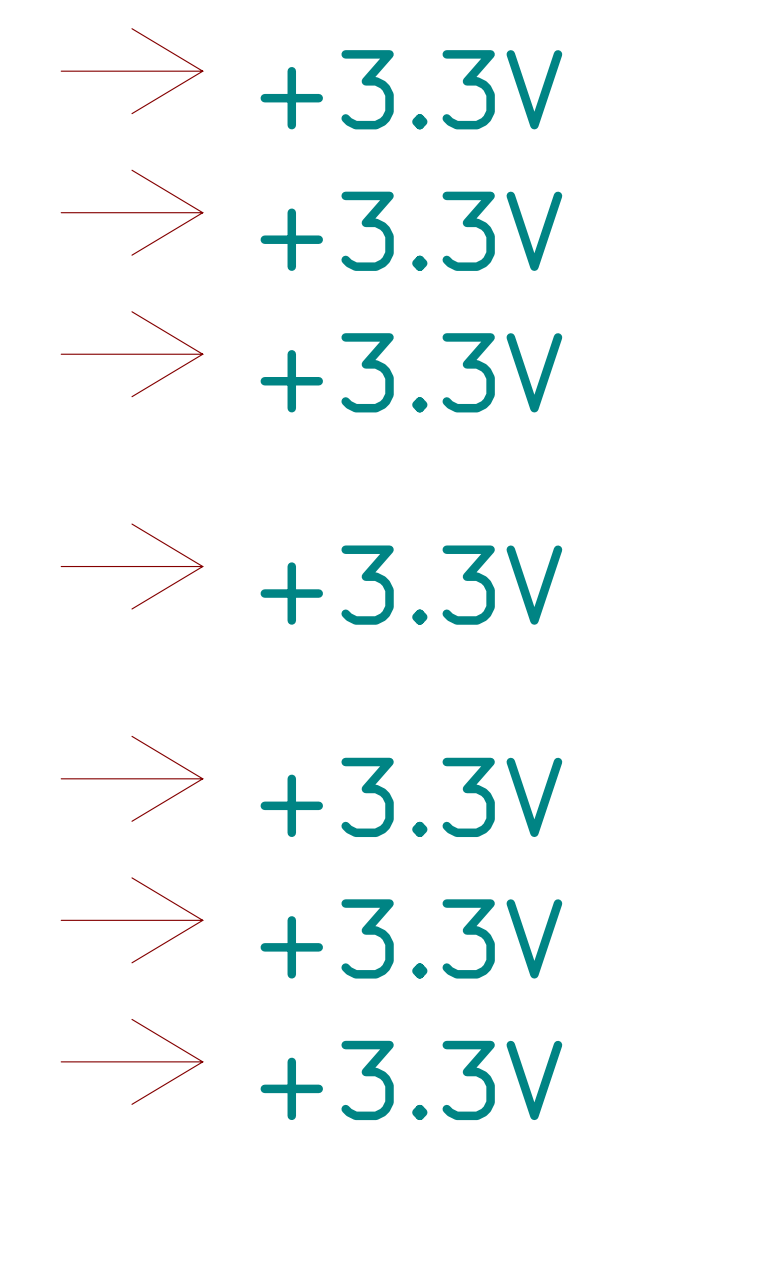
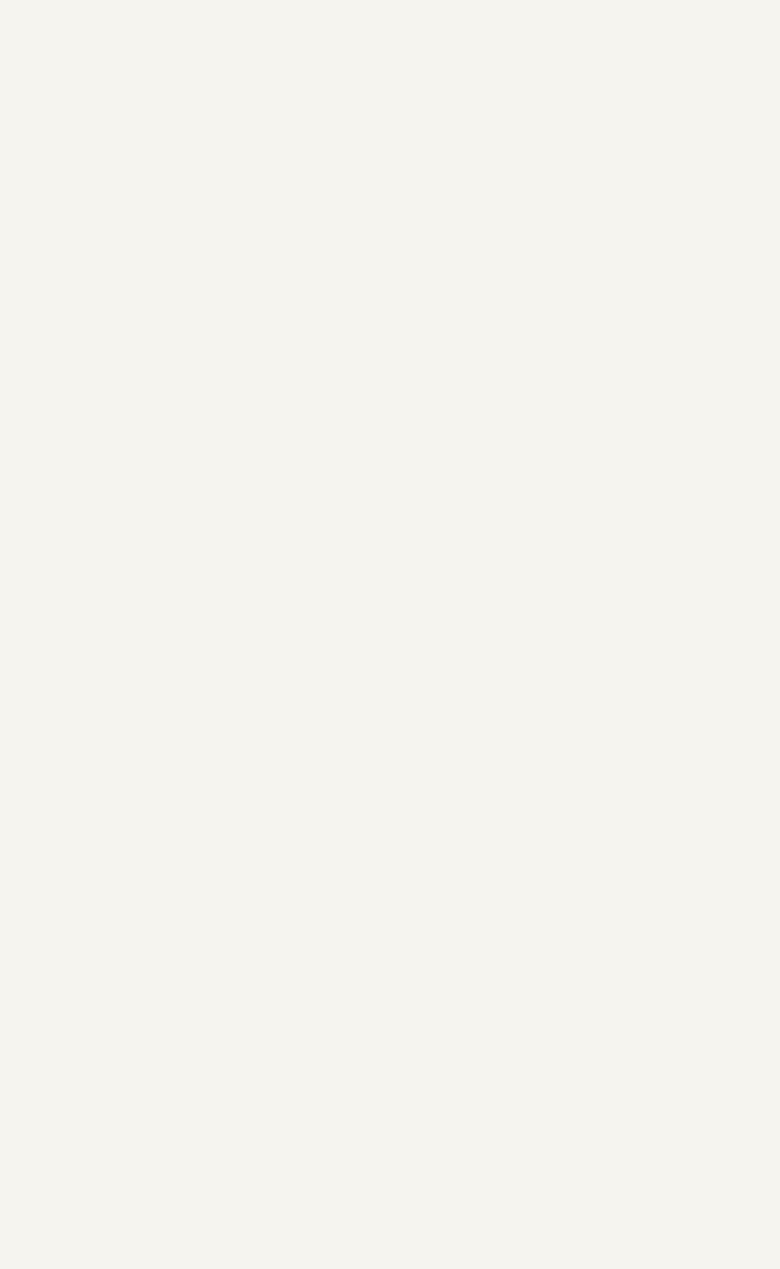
power symbol: +3.3V (131, 71) -> none
power symbol: +3.3V (131, 212) -> none
power symbol: +3.3V (131, 354) -> none
power symbol: +3.3V (131, 566) -> none
power symbol: +3.3V (131, 778) -> none
power symbol: +3.3V (131, 920) -> none
power symbol: +3.3V (131, 1061) -> none

